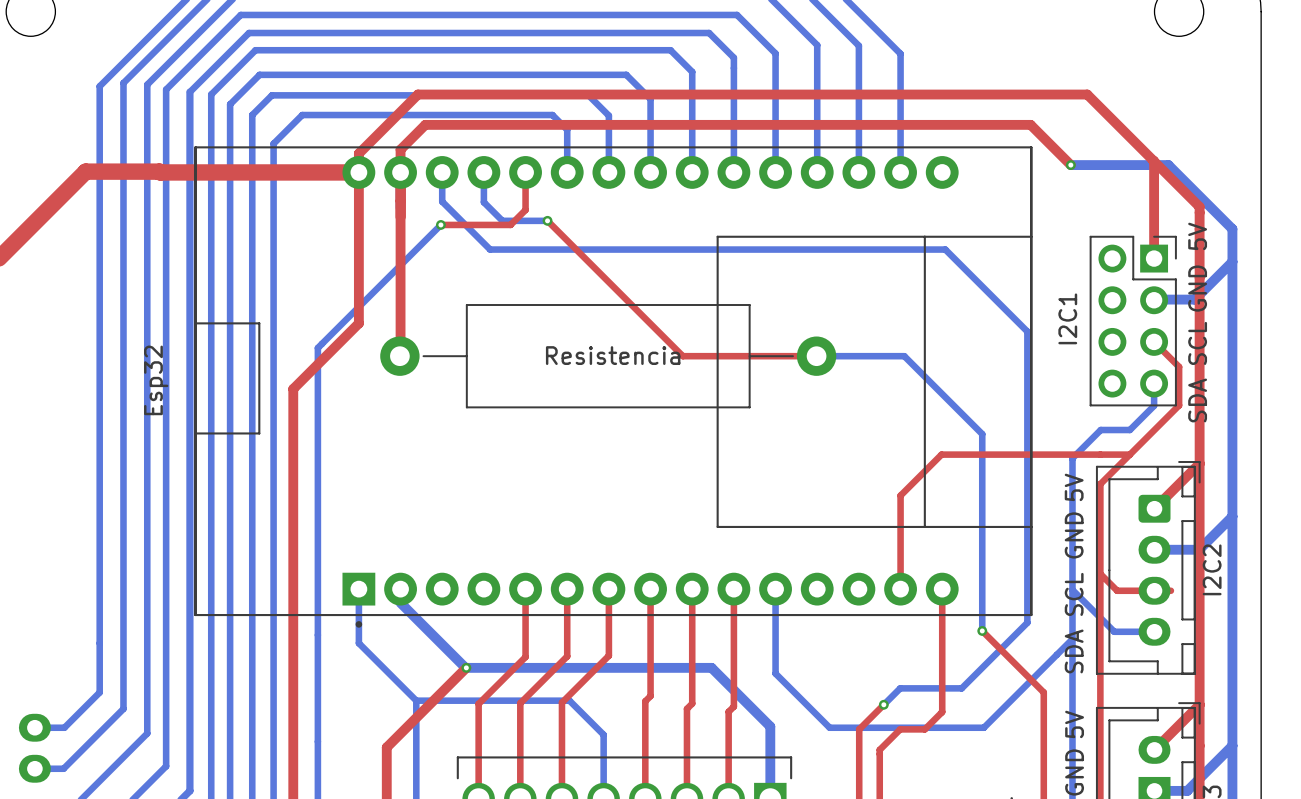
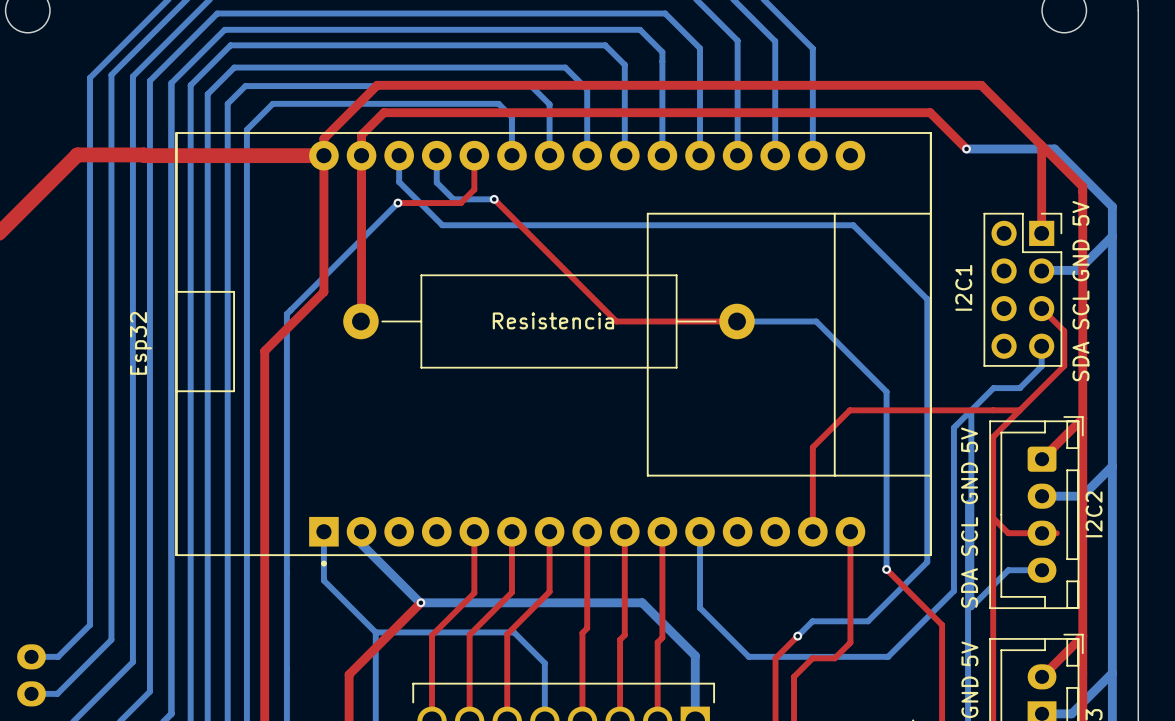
bottom track: (1072, 458) (1072, 557) -> (967, 413) (953, 427) (953, 590)
bottom track: (1072, 589) (1114, 631) (1117, 631) -> (971, 410) (971, 607) (1008, 570)
bottom track: (1072, 639) (1056, 654) -> none

